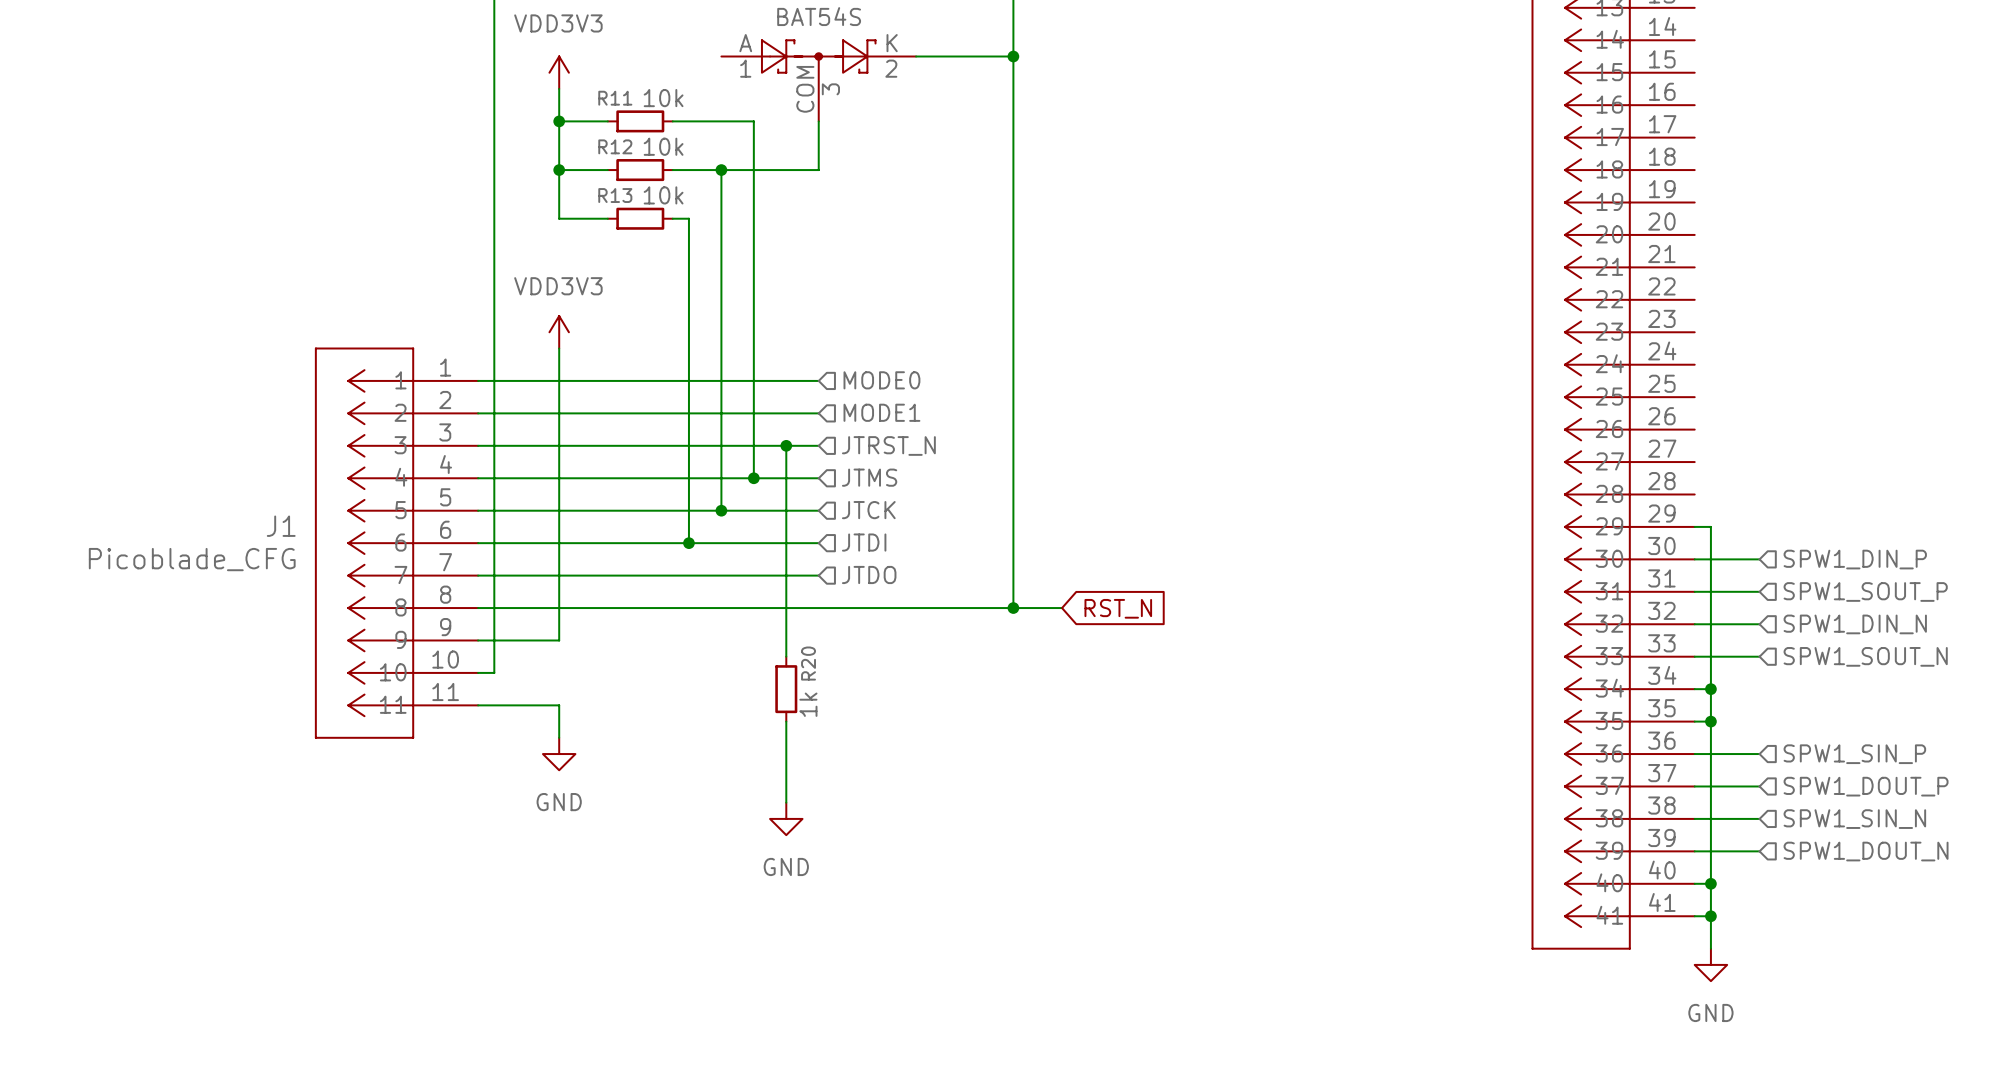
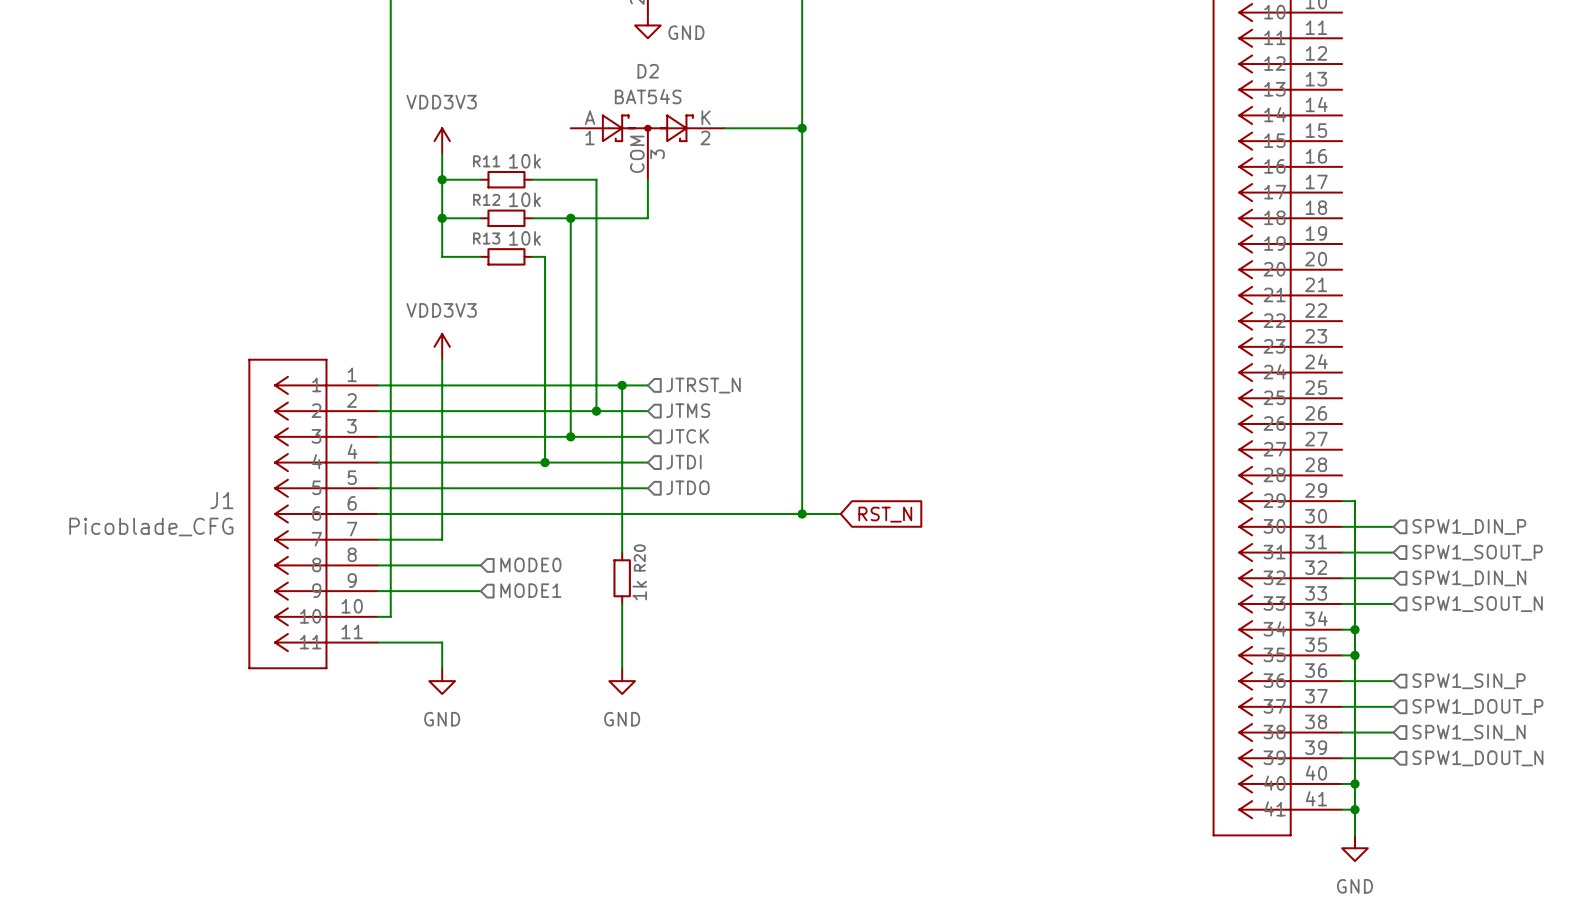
junction: none -> (622, 385)
hierarchical label: MODE0 (881, 380) -> JTRST_N (703, 385)
hierarchical label: MODE1 (881, 412) -> JTMS (688, 410)
wire: (753, 413) (753, 478) -> (622, 385) (622, 436)
junction: none -> (596, 411)
wire: (721, 445) (721, 510) -> none
junction: none -> (570, 436)
junction: (786, 445) -> none
hierarchical label: JTRST_N (888, 445) -> JTCK (687, 436)
hierarchical label: JTMS (869, 477) -> JTDI (683, 462)
wire: (688, 478) (688, 543) -> none
junction: none -> (545, 462)
junction: (753, 478) -> none
junction: (721, 510) -> none
hierarchical label: JTCK (868, 510) -> JTDO (687, 487)
hierarchical label: JTDI (864, 542) -> none
junction: (688, 543) -> none
wire: none -> (647, 513) (840, 513)
wire: (1013, 543) (1013, 608) -> none
hierarchical label: JTDO (869, 574) -> none
wire: (818, 575) (559, 575) (559, 640) -> (480, 591) (442, 591)
wire: (786, 591) (786, 656) -> (622, 655) (622, 603)
hierarchical label: none -> MODE0 (530, 564)
wire: (607, 608) (1062, 608) -> none
junction position: (1013, 608) -> (802, 513)
global label position: RST_N (1118, 608) -> RST_N (885, 514)
hierarchical label: none -> MODE1 (530, 590)
R20 position: (786, 689) -> (622, 578)
wire: (786, 737) (786, 802) -> none
power symbol position: GND (786, 818) -> GND (622, 681)

